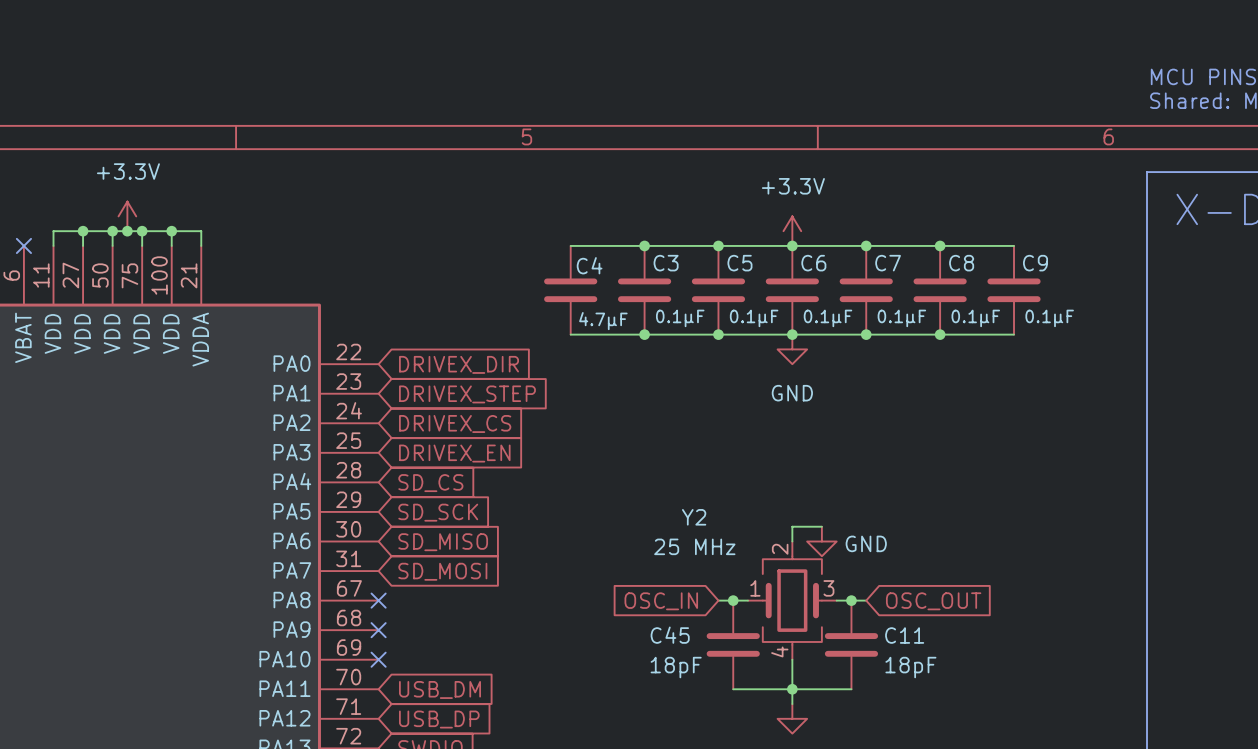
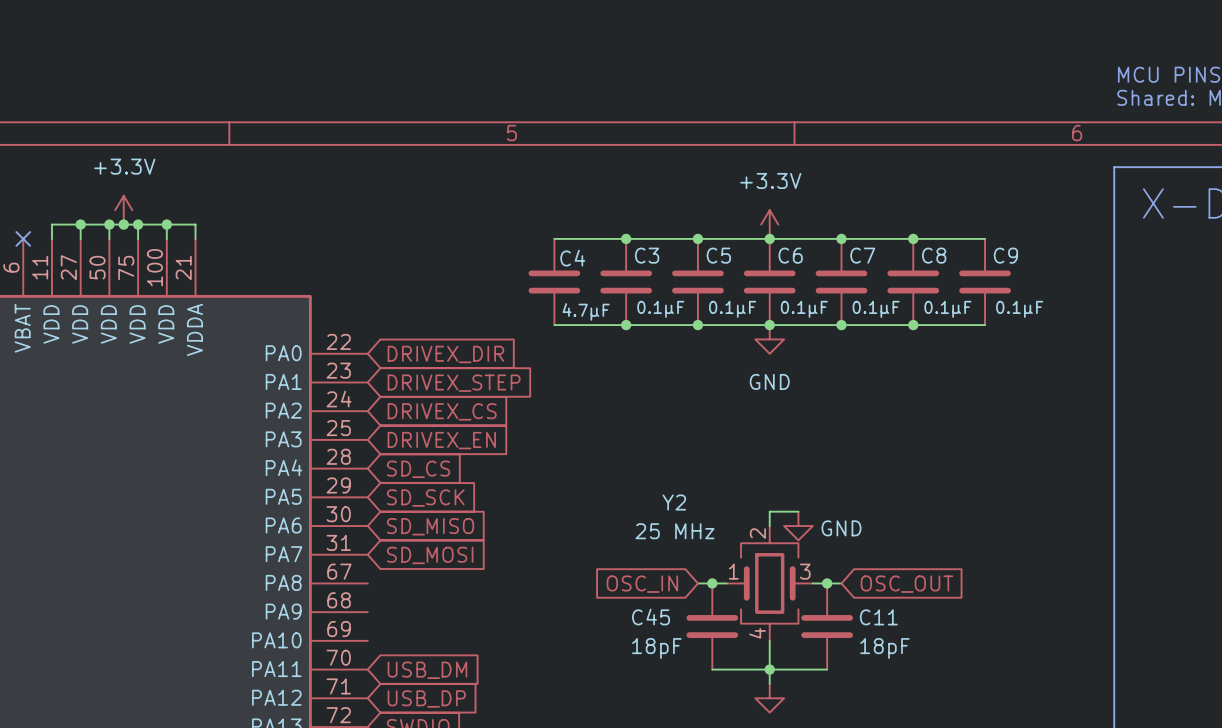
no-connect mark: (378, 600) -> none
no-connect mark: (378, 630) -> none
no-connect mark: (378, 659) -> none

